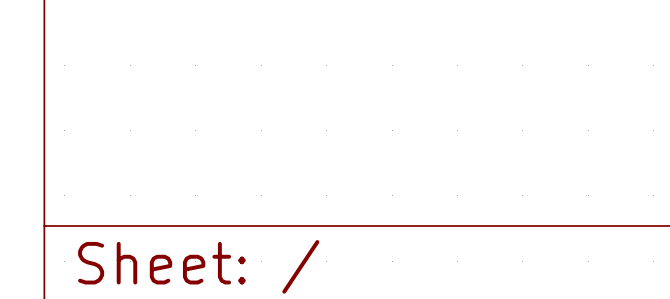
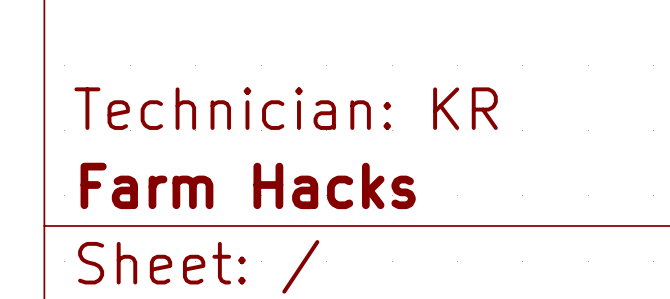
title block: none -> Technician: KR (286, 108)
title block: none -> Farm Hacks (248, 185)

